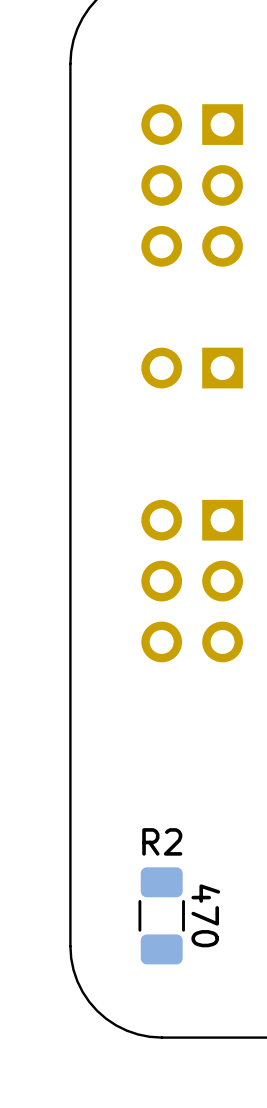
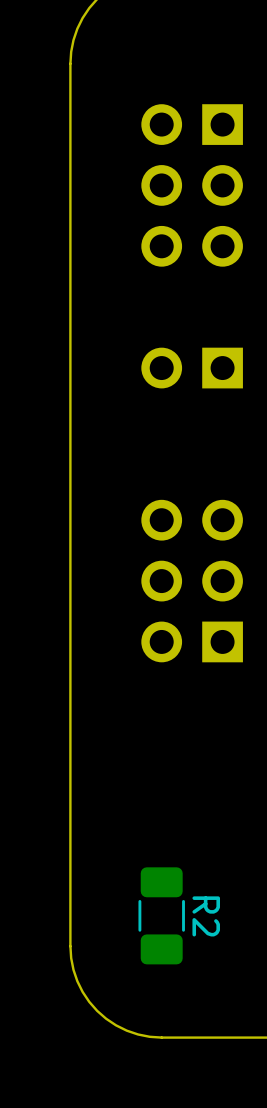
part footprint: [141, 499, 243, 663] -> [141, 499, 243, 663]
R2 name rotation: 0° (162, 841) -> 90° clockwise (206, 916)
R2 name position: R2 (162, 841) -> R2 (206, 916)
R2 value: 470 (205, 915) -> none

